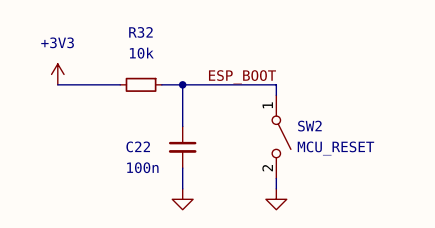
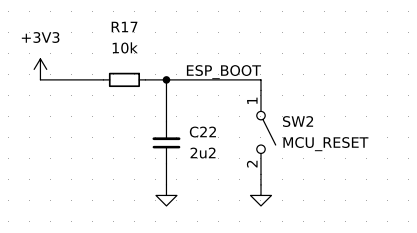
R32 name: R32 (140, 32) -> R17 (124, 27)
C22 rotation: 0° (182, 147) -> 180° (166, 142)
C22 value: 100n (142, 167) -> 2u2 (203, 153)

